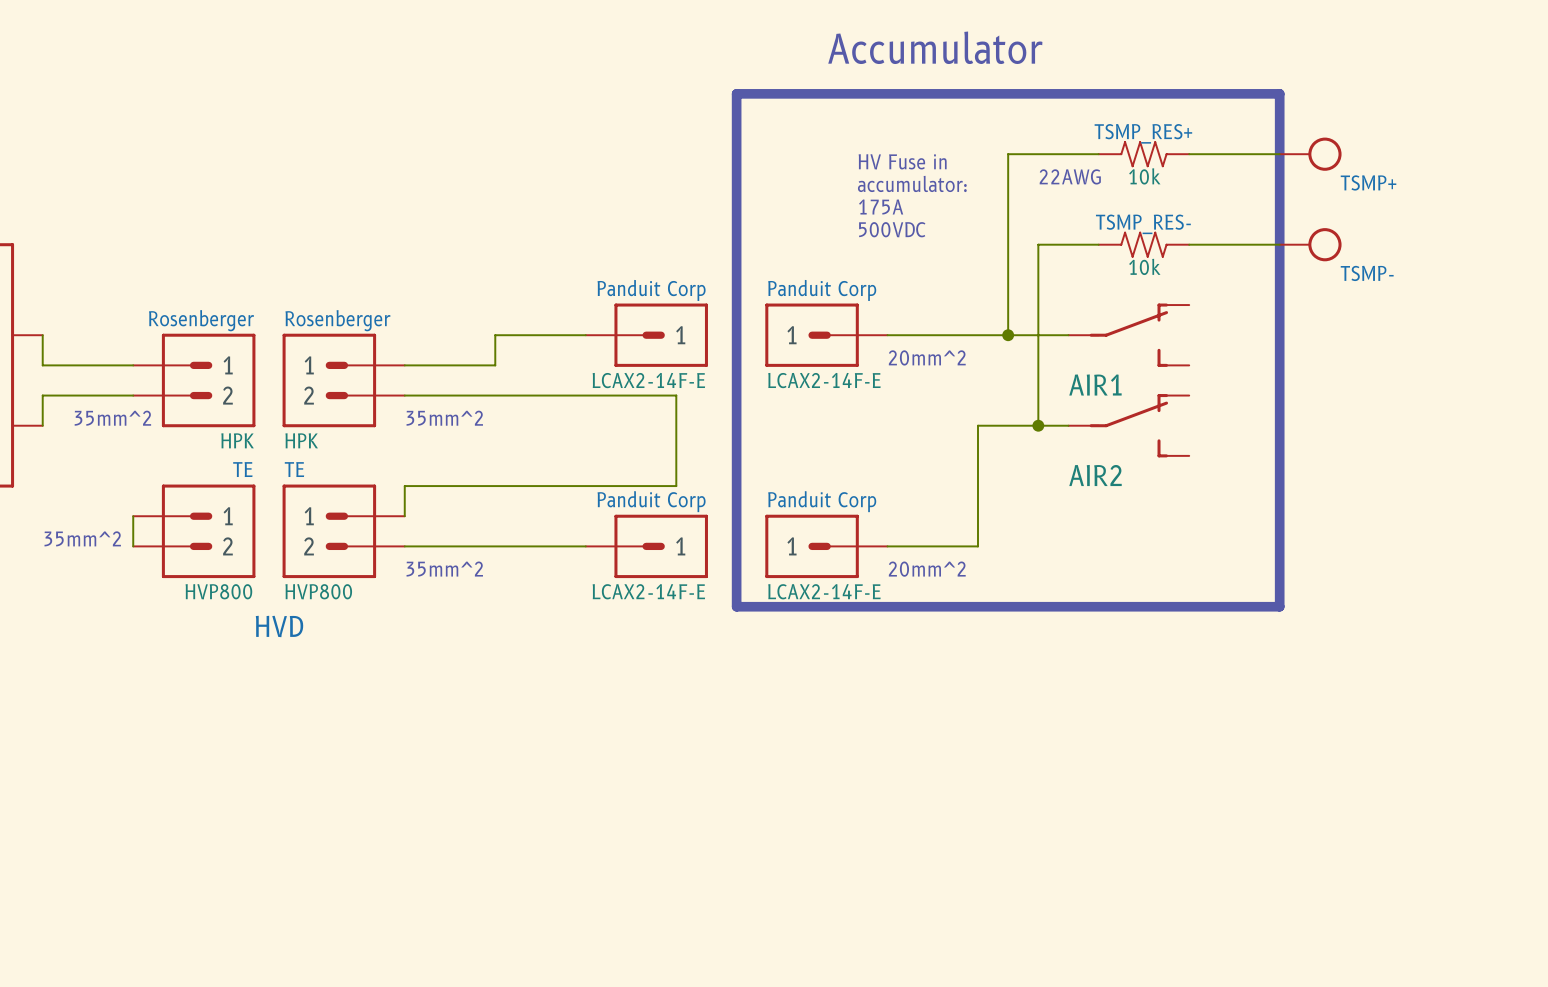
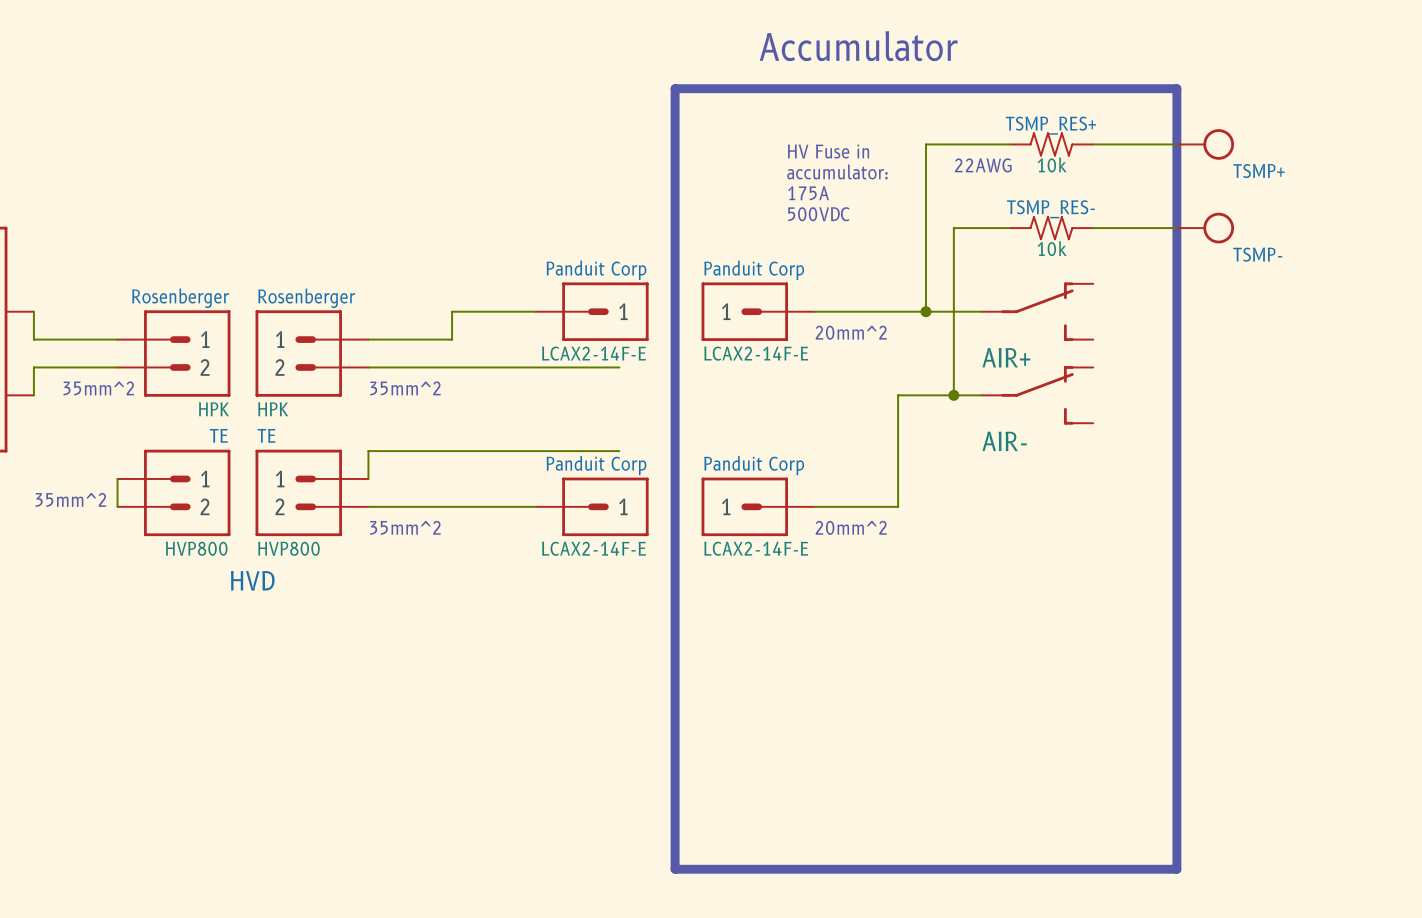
AIR1 name: AIR1 (1095, 384) -> AIR+ (1006, 357)
wire: (676, 395) (676, 486) -> none
AIR2 name: AIR2 (1095, 475) -> AIR- (1004, 441)
line: (736, 606) (1279, 606) -> (675, 562) (675, 869) (1176, 869) (1176, 562)

